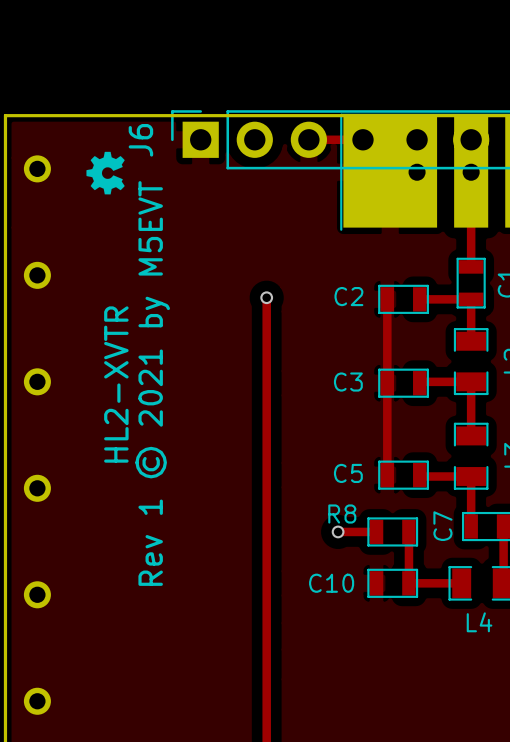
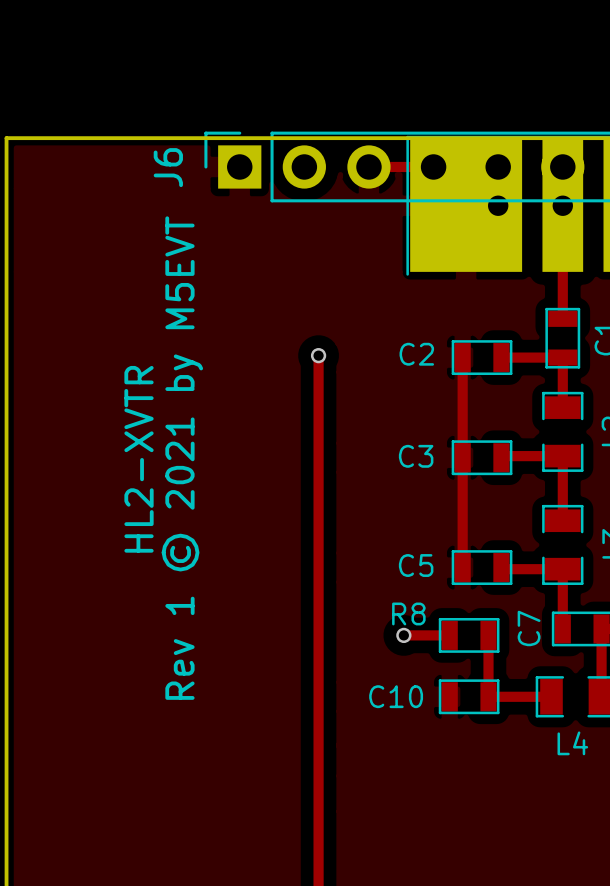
drawing: [86, 151, 125, 195] -> none
part: (37, 168) -> none
part: (37, 275) -> none
part: (37, 381) -> none
part: (37, 488) -> none
part: (37, 594) -> none
part: (37, 701) -> none

